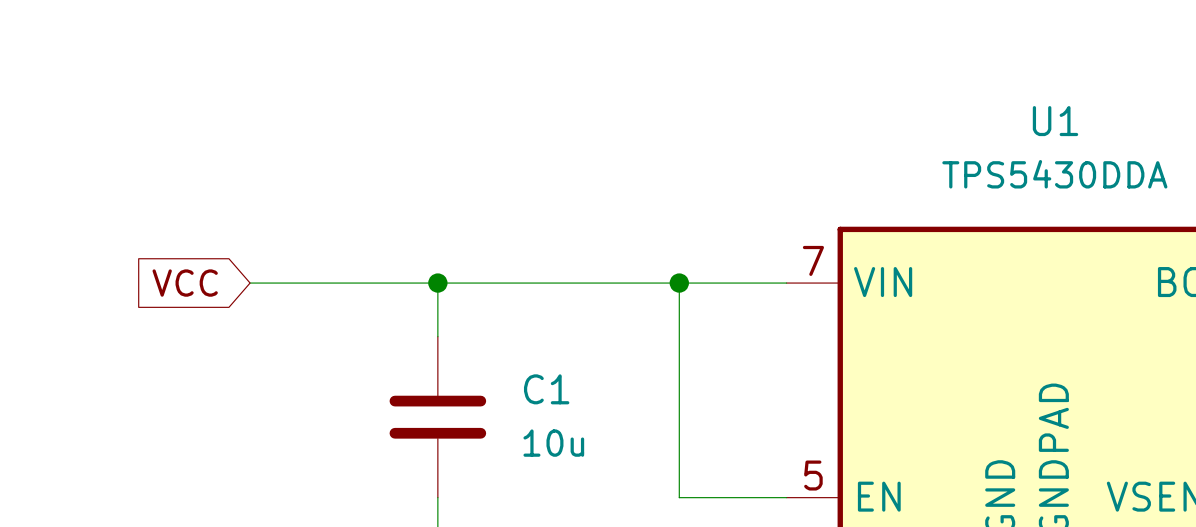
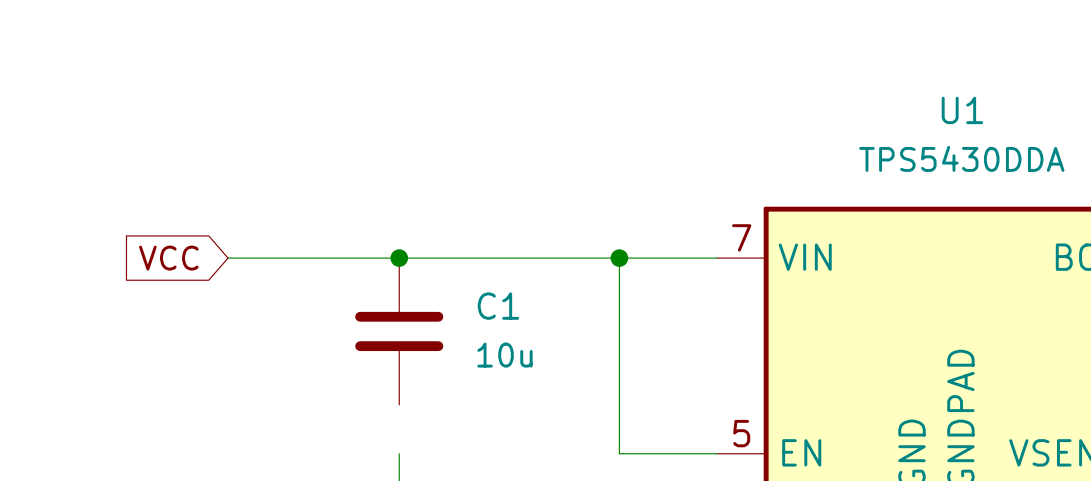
C1 position: (437, 417) -> (399, 331)

